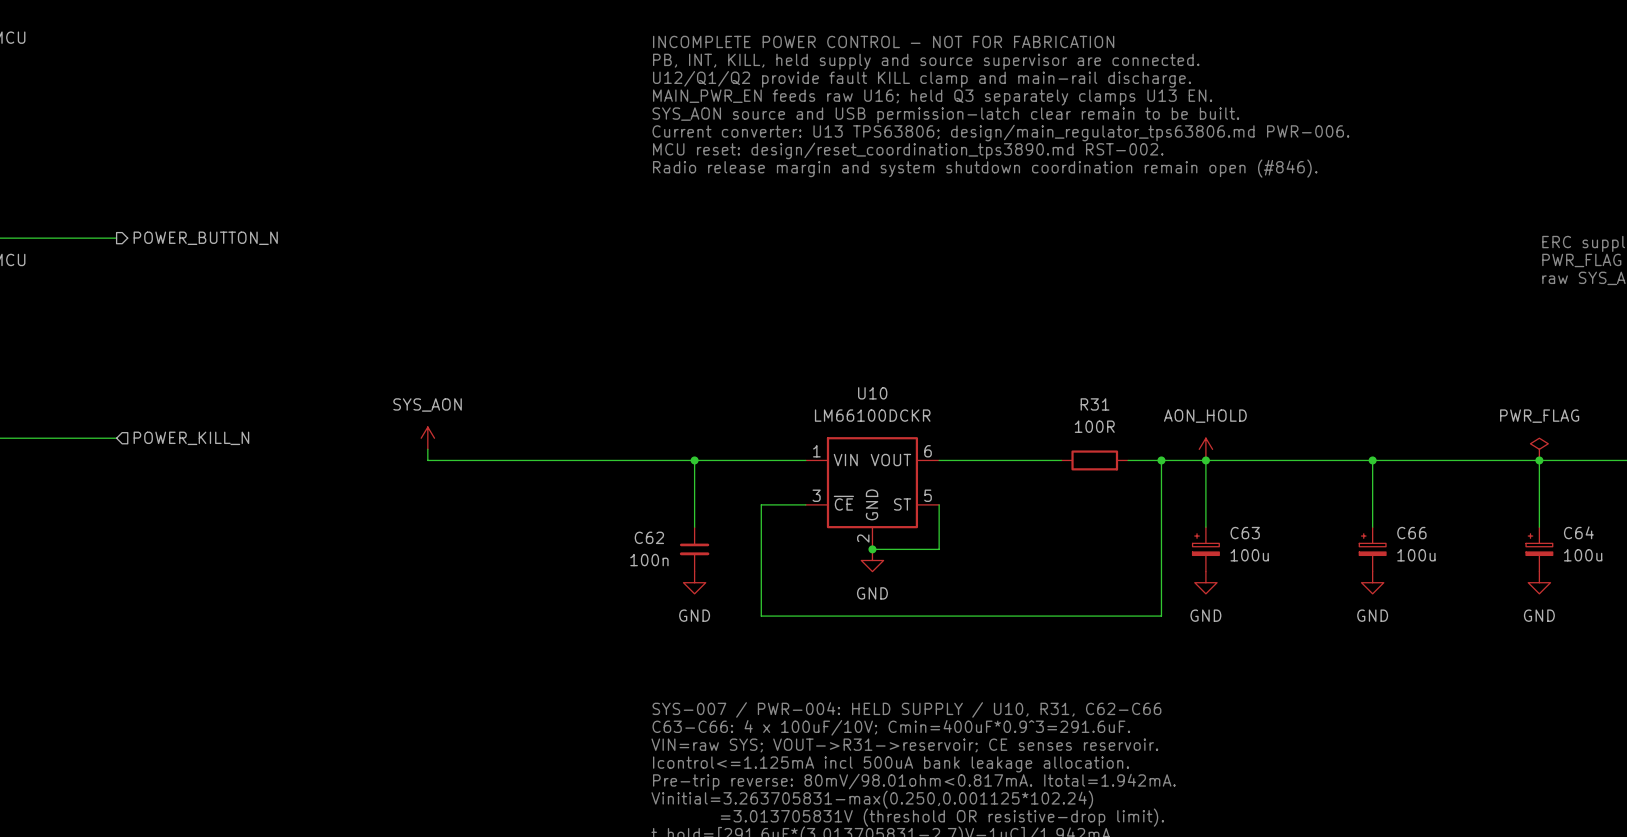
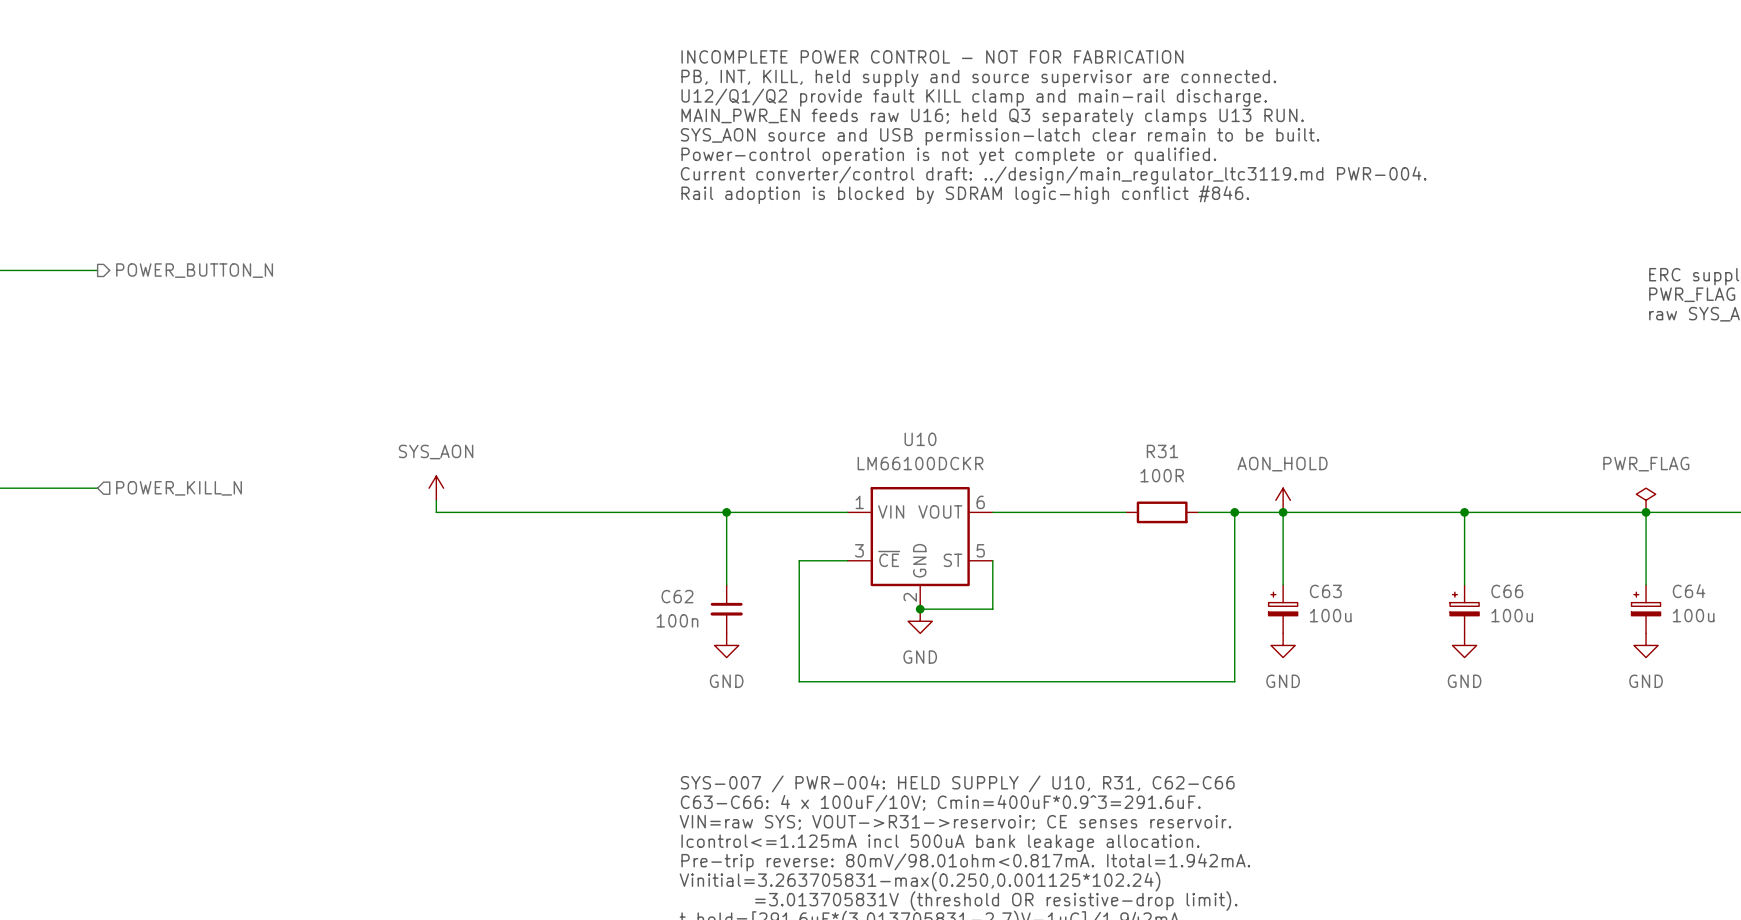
text: MAIN_PWR_EN feeds raw U16; held Q3 separately clamps U13 EN. (932, 97) -> MAIN_PWR_EN feeds raw U16; held Q3 separately clamps U13 RUN. (992, 117)
text: Current converter: U13 TPS63806; design/main_regulator_tps63806.md PWR-006. (1000, 133) -> Power-control operation is not yet complete or qualified. (948, 156)
text: MCU reset: design/reset_coordination_tps3890.md RST-002. (908, 150) -> Current converter/control draft: ../design/main_regulator_ltc3119.md PWR-004. (1053, 175)
text: Radio release margin and system shutdown coordination remain open (#846). (985, 168) -> Rail adoption is blocked by SDRAM logic-high conflict #846. (965, 194)

